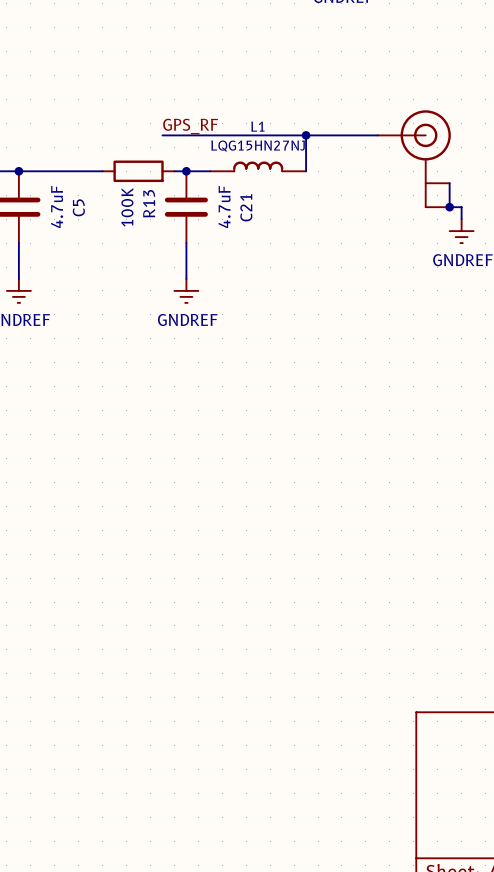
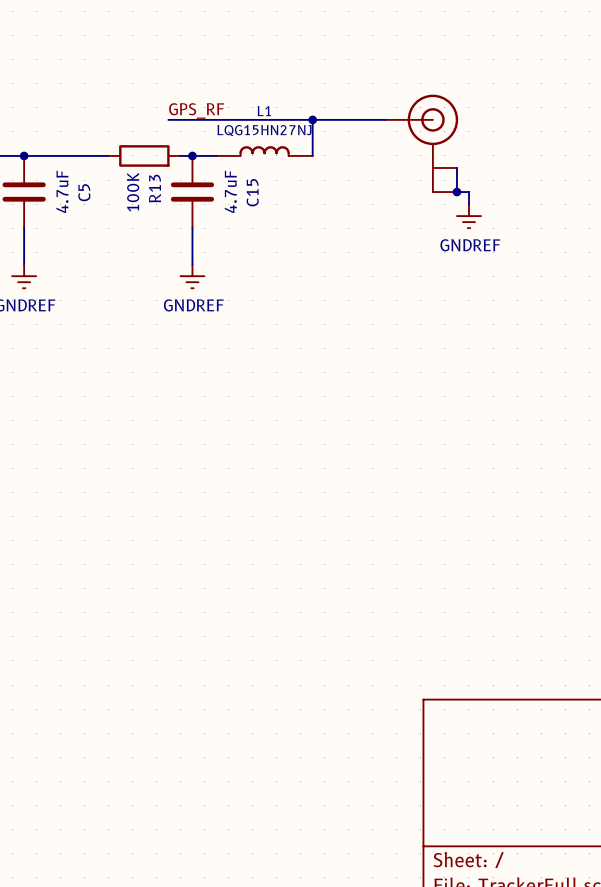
C21 name: C21 (246, 207) -> C15 (252, 192)

